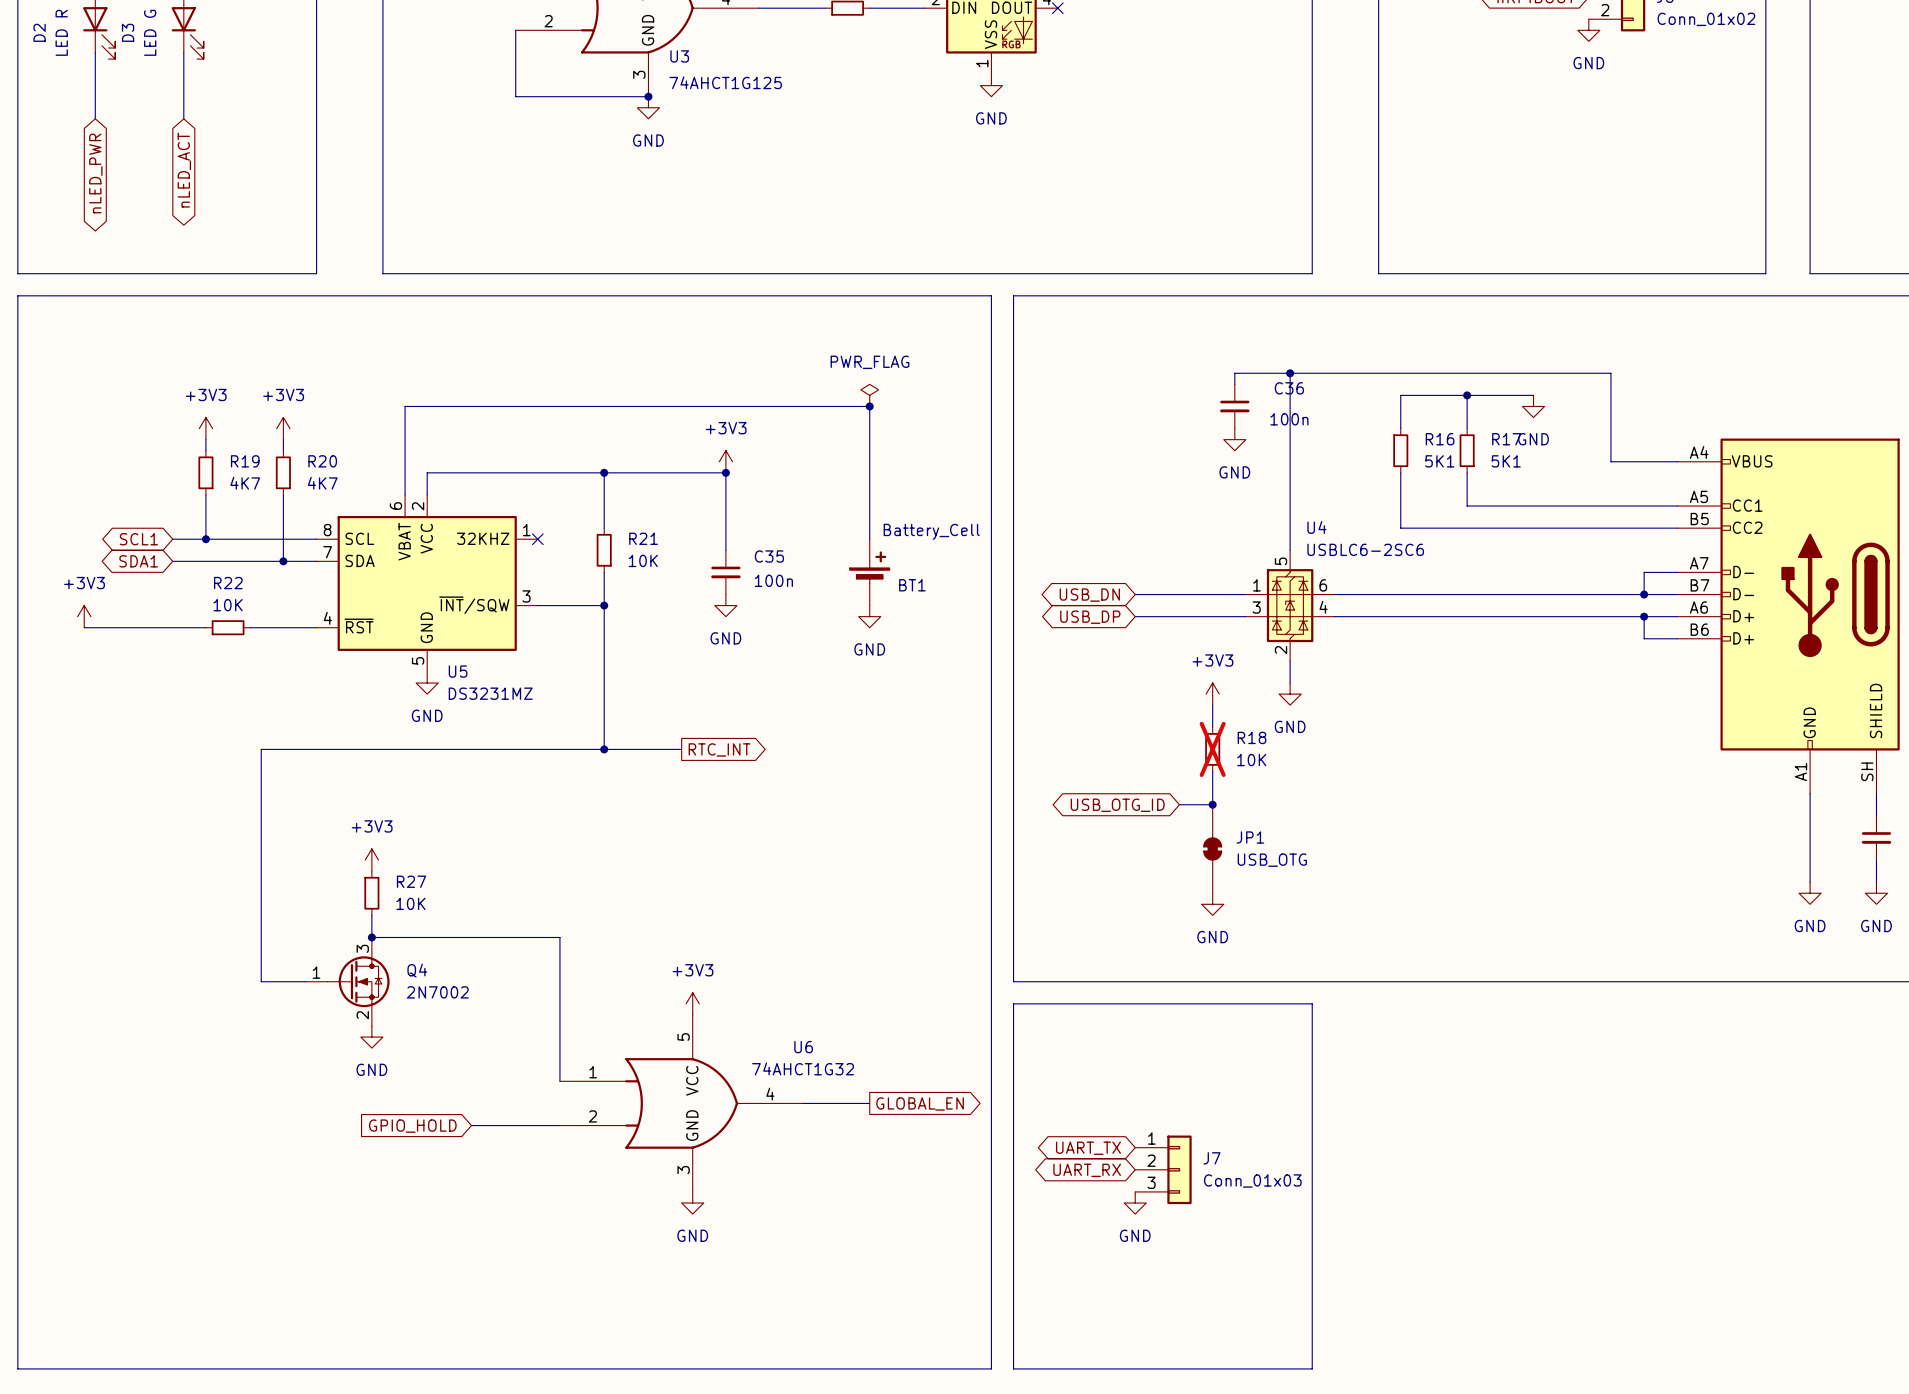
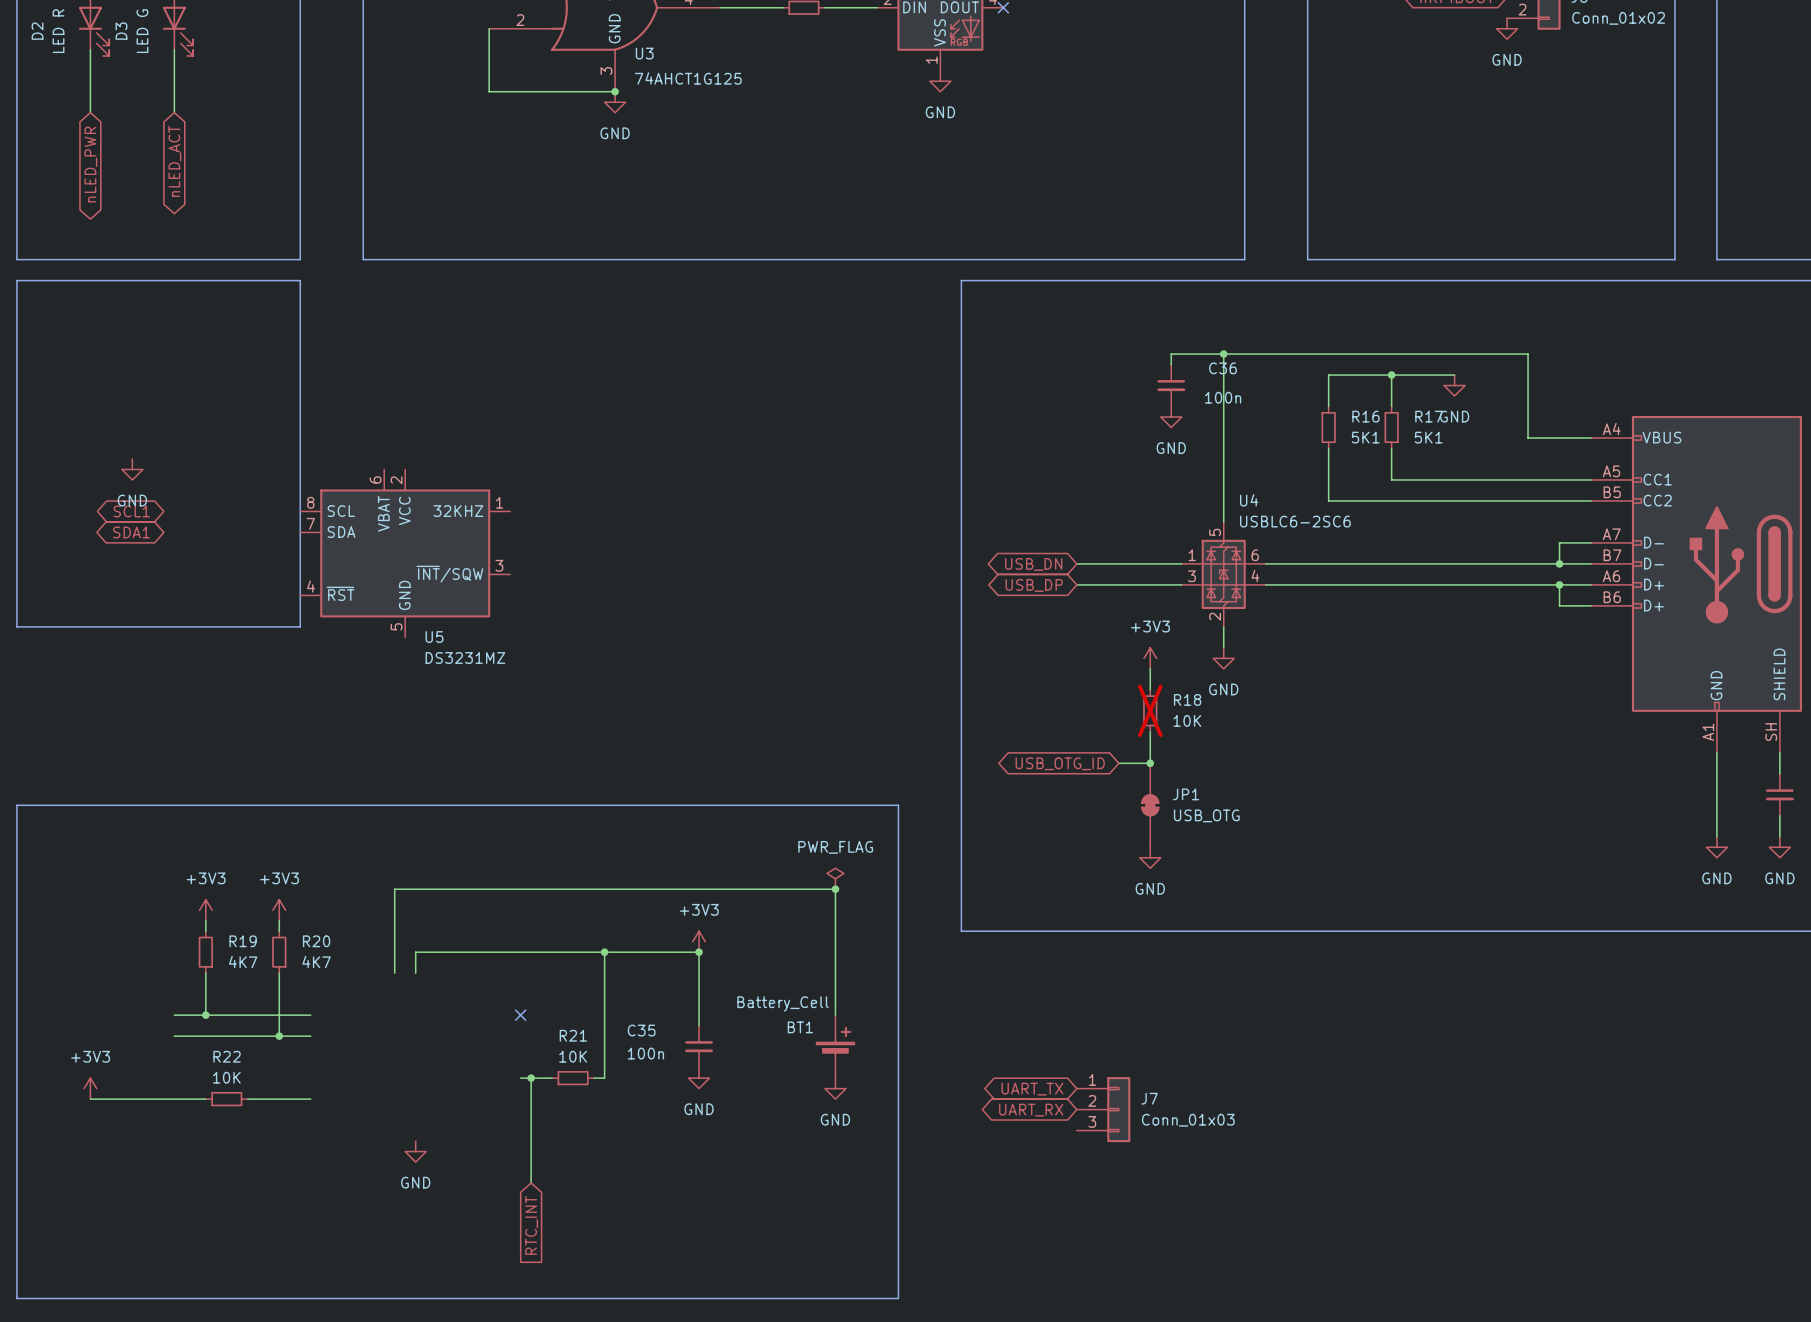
line: (316, 295) (991, 295) (991, 1368) (947, 1368) -> (16, 805) (898, 805) (898, 1298)
power symbol: PWR_FLAG (869, 395) -> none
junction: (869, 406) -> none
power symbol: +3V3 (205, 428) -> none
power symbol: +3V3 (283, 428) -> none
wire: (205, 439) (205, 450) -> none
wire: (283, 439) (283, 450) -> none
power symbol: +3V3 (725, 461) -> none
R19 position: (205, 472) -> (205, 952)
R20 position: (283, 472) -> (279, 952)
wire: (604, 472) (604, 528) -> none
junction: (604, 472) -> none
junction: (725, 472) -> none
power symbol: none -> GND (132, 469)
wire: (205, 494) (205, 539) -> none
wire: (283, 494) (283, 561) -> none
wire: (405, 494) (405, 406) (869, 406) (869, 539) -> none
wire: (427, 494) (427, 472) (725, 472) (725, 550) -> none
BT1 value position: Battery_Cell (931, 531) -> Battery_Cell (783, 1003)
R21 name position: R21 (643, 538) -> R21 (573, 1035)
wire: (172, 539) (316, 539) -> none
junction: (205, 539) -> none
no-connect mark: (537, 539) -> none
R21 rotation: 0° (604, 550) -> 90° clockwise (573, 1078)
R21 position: (604, 550) -> (573, 1078)
C35 name position: C35 (769, 556) -> C35 (641, 1030)
R21 value position: 10K (643, 560) -> 10K (573, 1056)
wire: (172, 561) (316, 561) -> none
junction: (283, 561) -> none
wire: (604, 572) (604, 749) -> none
C35 position: (725, 572) -> (699, 1046)
BT1 position: (869, 572) -> (835, 1046)
C35 value position: 100n (773, 580) -> 100n (645, 1053)
BT1 name position: BT1 (912, 585) -> BT1 (800, 1027)
wire: (537, 605) (604, 605) -> none
junction: (604, 605) -> none
power symbol: GND (725, 605) -> none
power symbol: +3V3 (84, 616) -> none
power symbol: GND (869, 616) -> none
wire: (84, 627) (205, 627) -> none
R22 position: (228, 627) -> (226, 1099)
wire: (250, 627) (316, 627) -> none
line: (17, 660) (17, 848) -> (16, 626) (300, 626) (300, 280)
power symbol: GND (427, 683) -> none
junction: (604, 749) -> none
wire: (681, 749) (261, 749) (261, 981) (305, 981) -> none
global label: RTC_INT (719, 749) -> none
power symbol: +3V3 (371, 860) -> none
R27: 10K (371, 893) -> none
wire: (371, 915) (371, 937) (416, 937) -> (394, 973) (394, 889)
power symbol: none -> PWR_FLAG (835, 878)
junction: (371, 937) -> none
wire: (559, 937) (559, 1081) -> (531, 889) (835, 889) (835, 1015)
junction: none -> (835, 889)
power symbol: none -> +3V3 (205, 910)
power symbol: none -> +3V3 (279, 910)
wire: none -> (205, 920) (205, 931)
wire: none -> (279, 920) (279, 931)
Q4: 2N7002 (347, 981) -> none
wire: none -> (604, 952) (604, 1078) (594, 1078)
junction: none -> (604, 952)
power symbol position: +3V3 (692, 1003) -> +3V3 (699, 941)
junction: none -> (699, 952)
line: (1013, 1003) (1312, 1003) (1312, 1368) (1013, 1368) (1013, 1003) -> none
wire: none -> (205, 973) (205, 1015)
wire: none -> (279, 973) (279, 1036)
wire: none -> (415, 973) (415, 952) (699, 952) (699, 1025)
power symbol: GND (371, 1037) -> none
wire: none -> (174, 1015) (310, 1015)
junction: none -> (205, 1015)
no-connect mark: none -> (520, 1015)
wire: none -> (174, 1036) (310, 1036)
junction: none -> (279, 1036)
U6: 74AHCT1G32 (681, 1103) -> none
wire: (803, 1103) (869, 1103) -> none
global label: GLOBAL_EN (920, 1103) -> none
wire: (471, 1125) (559, 1125) -> none
global label: GPIO_HOLD (412, 1126) -> none
wire: none -> (520, 1078) (552, 1078)
wire: none -> (531, 1078) (531, 1183)
junction: none -> (531, 1078)
power symbol: none -> +3V3 (90, 1088)
power symbol: none -> GND (835, 1088)
wire: none -> (90, 1099) (205, 1099)
wire: none -> (247, 1099) (310, 1099)
power symbol position: GND (692, 1203) -> GND (699, 1078)
power symbol: GND (1135, 1203) -> none
power symbol: none -> GND (415, 1151)
global label: none -> RTC_INT (531, 1225)

